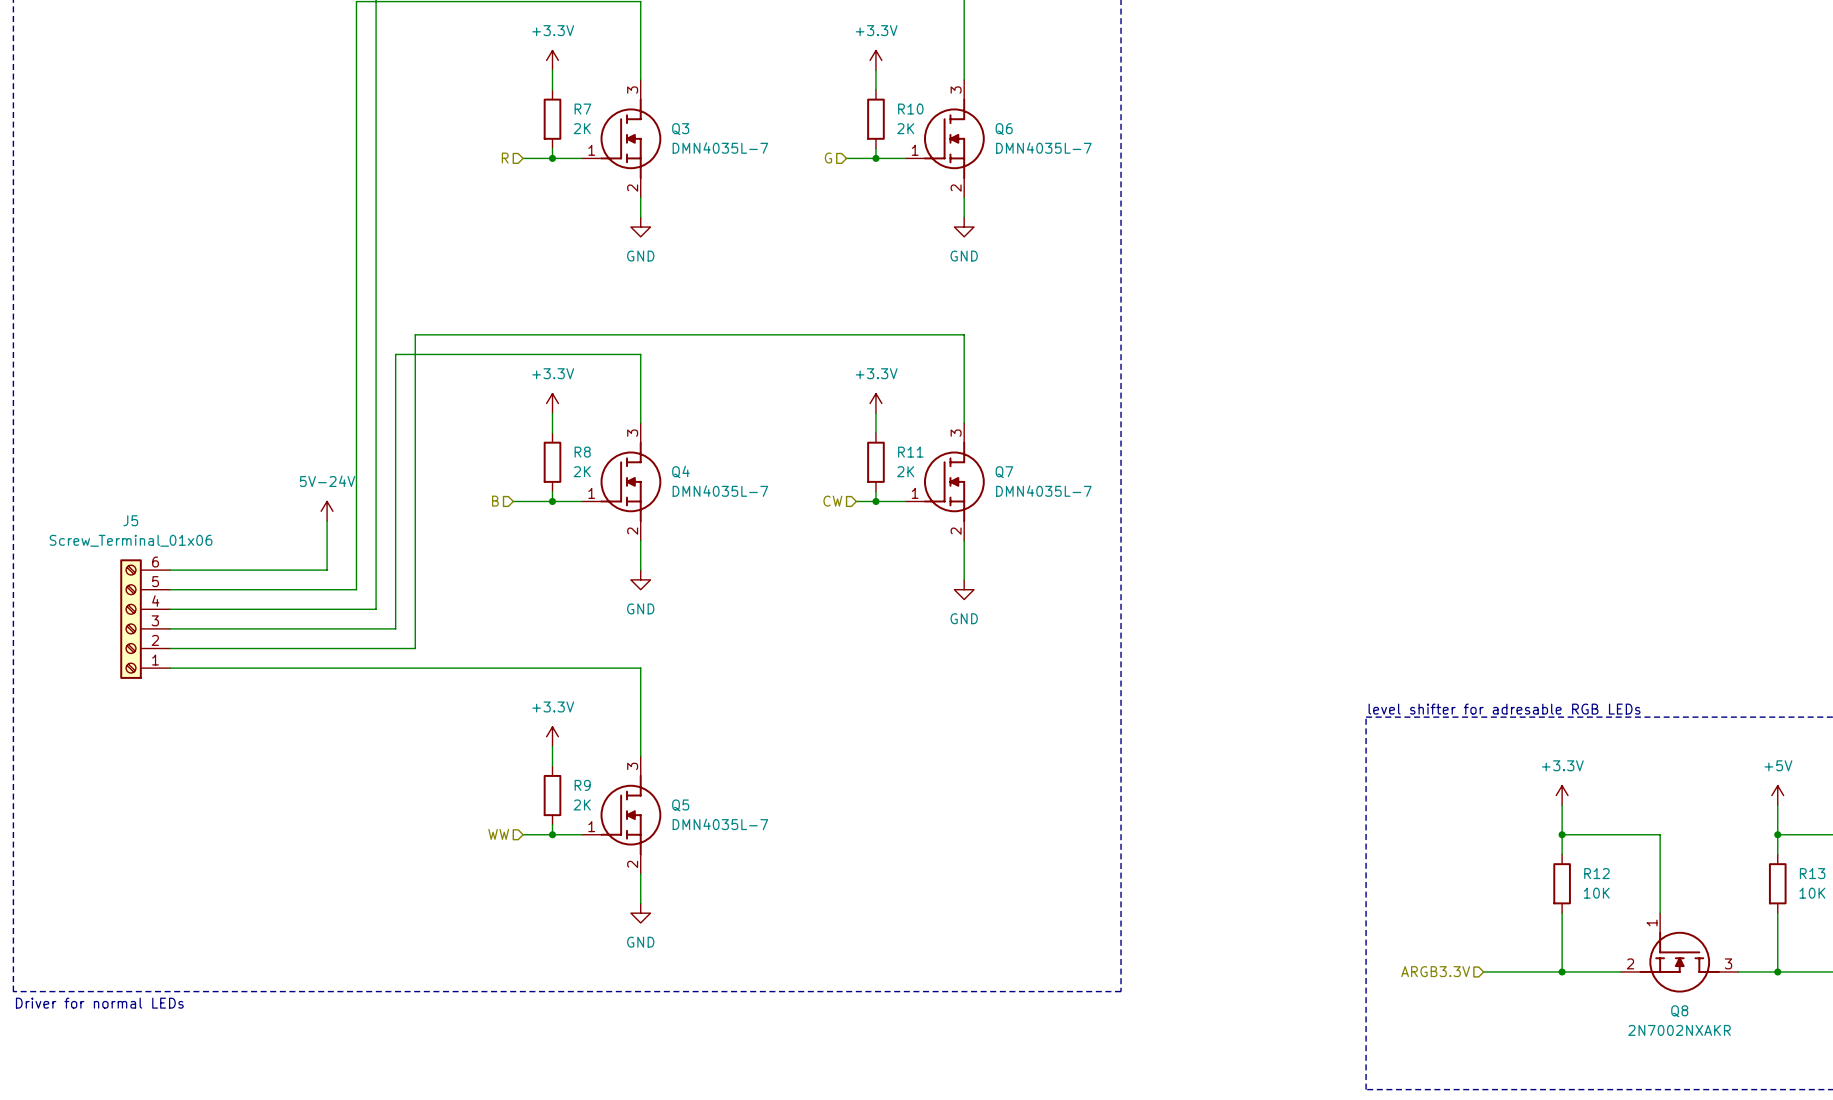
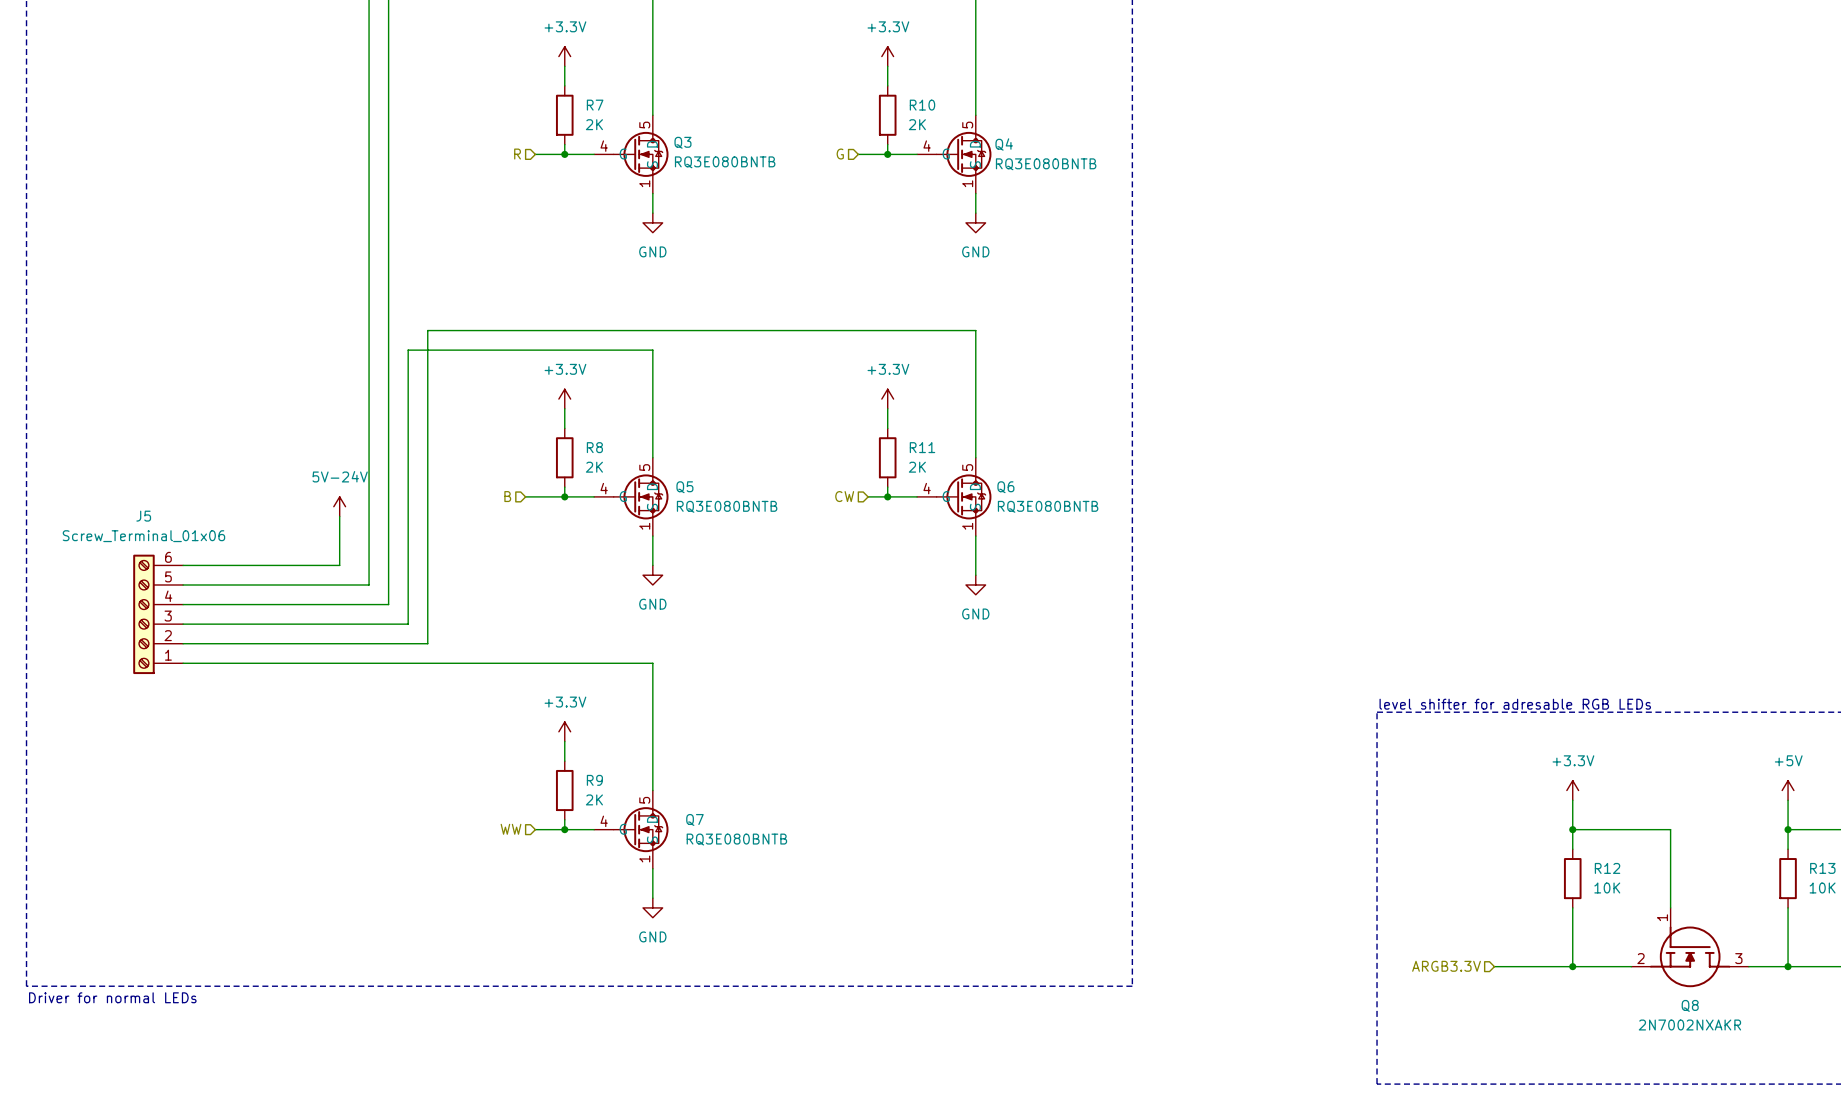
Q3 symbol: [581, 80, 662, 198] -> [594, 115, 669, 194]
Q6 symbol: [905, 80, 985, 198] -> [917, 457, 992, 537]
Q3 value: DMN4035L-7 (720, 148) -> RQ3E080BNTB (725, 162)
Q6 value: DMN4035L-7 (1043, 148) -> RQ3E080BNTB (1048, 506)
Q4 symbol: [581, 423, 662, 541] -> [917, 115, 992, 194]
Q7 symbol: [905, 423, 985, 541] -> [594, 790, 669, 869]
Q4 value: DMN4035L-7 (720, 491) -> RQ3E080BNTB (1046, 164)
Q7 value: DMN4035L-7 (1043, 491) -> RQ3E080BNTB (736, 839)
Q5 symbol: [581, 756, 662, 874] -> [594, 457, 669, 537]
Q5 value: DMN4035L-7 (720, 824) -> RQ3E080BNTB (727, 506)

